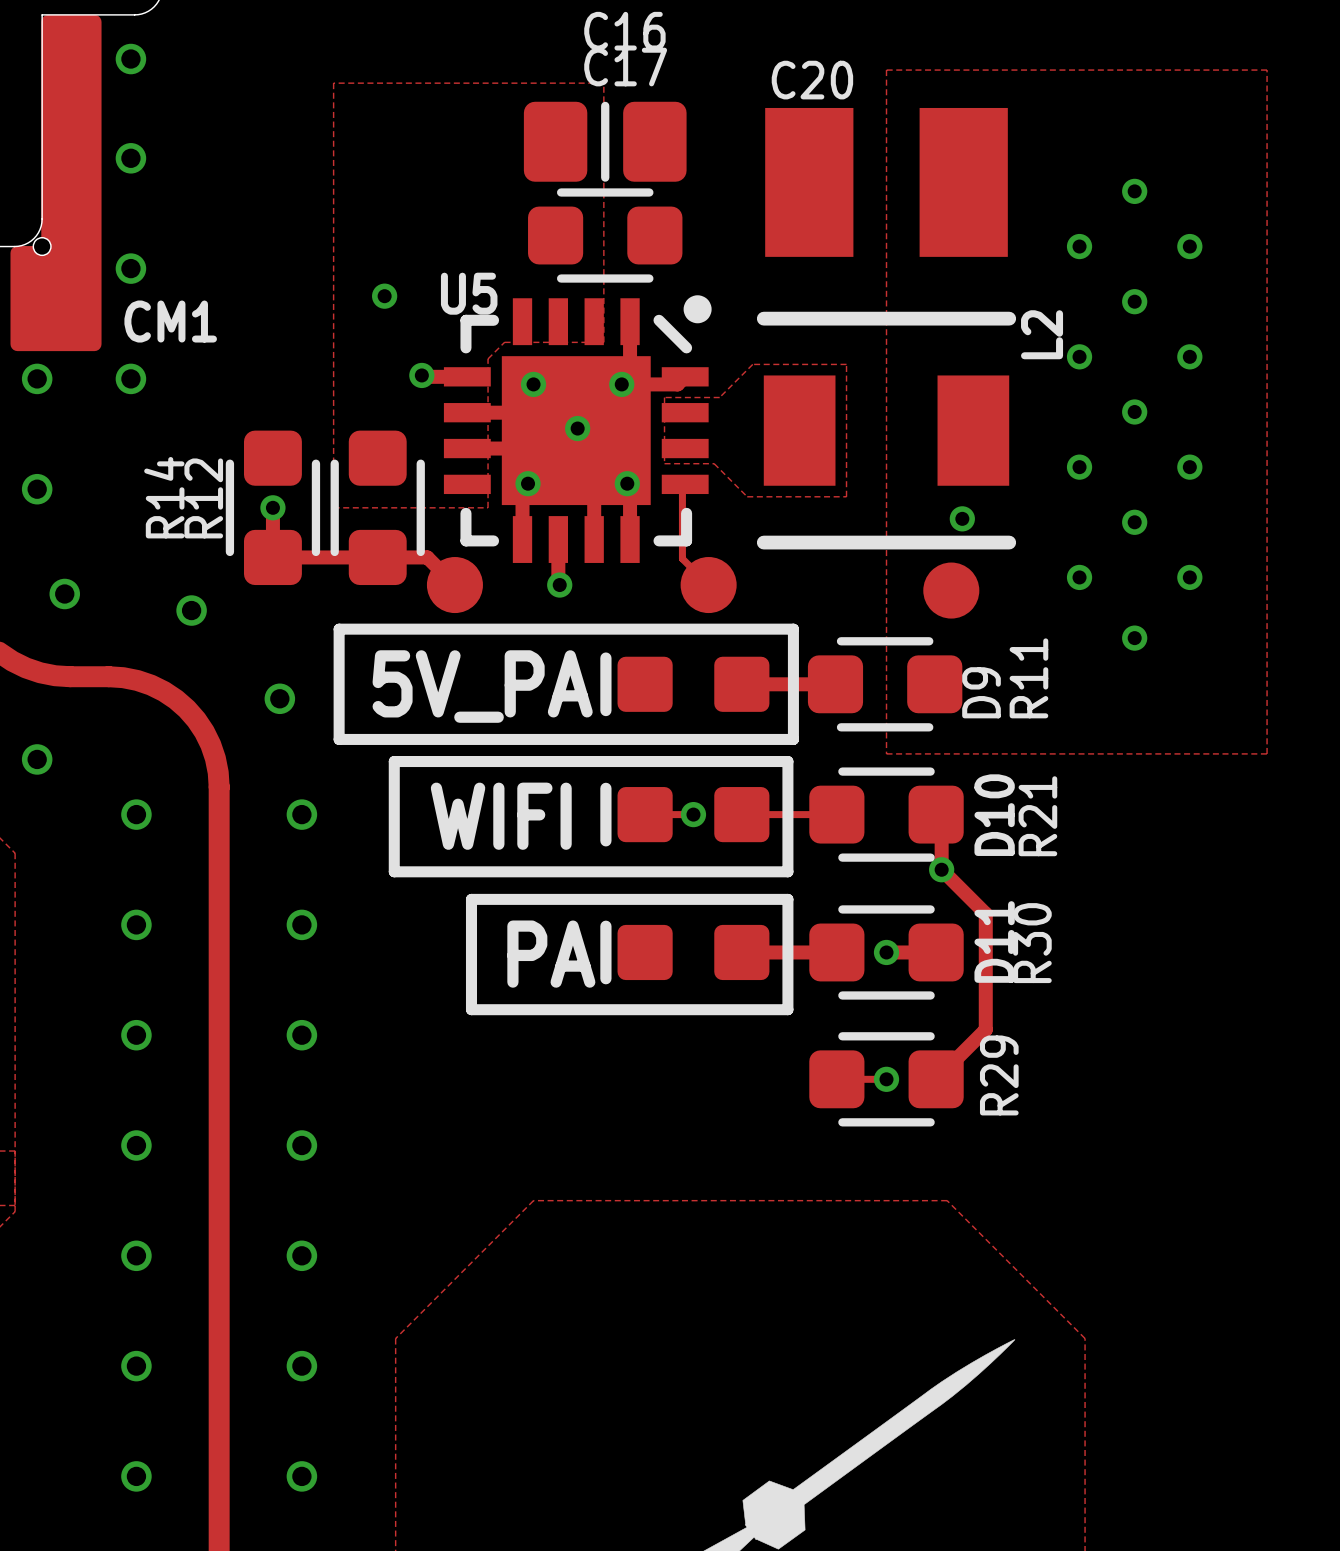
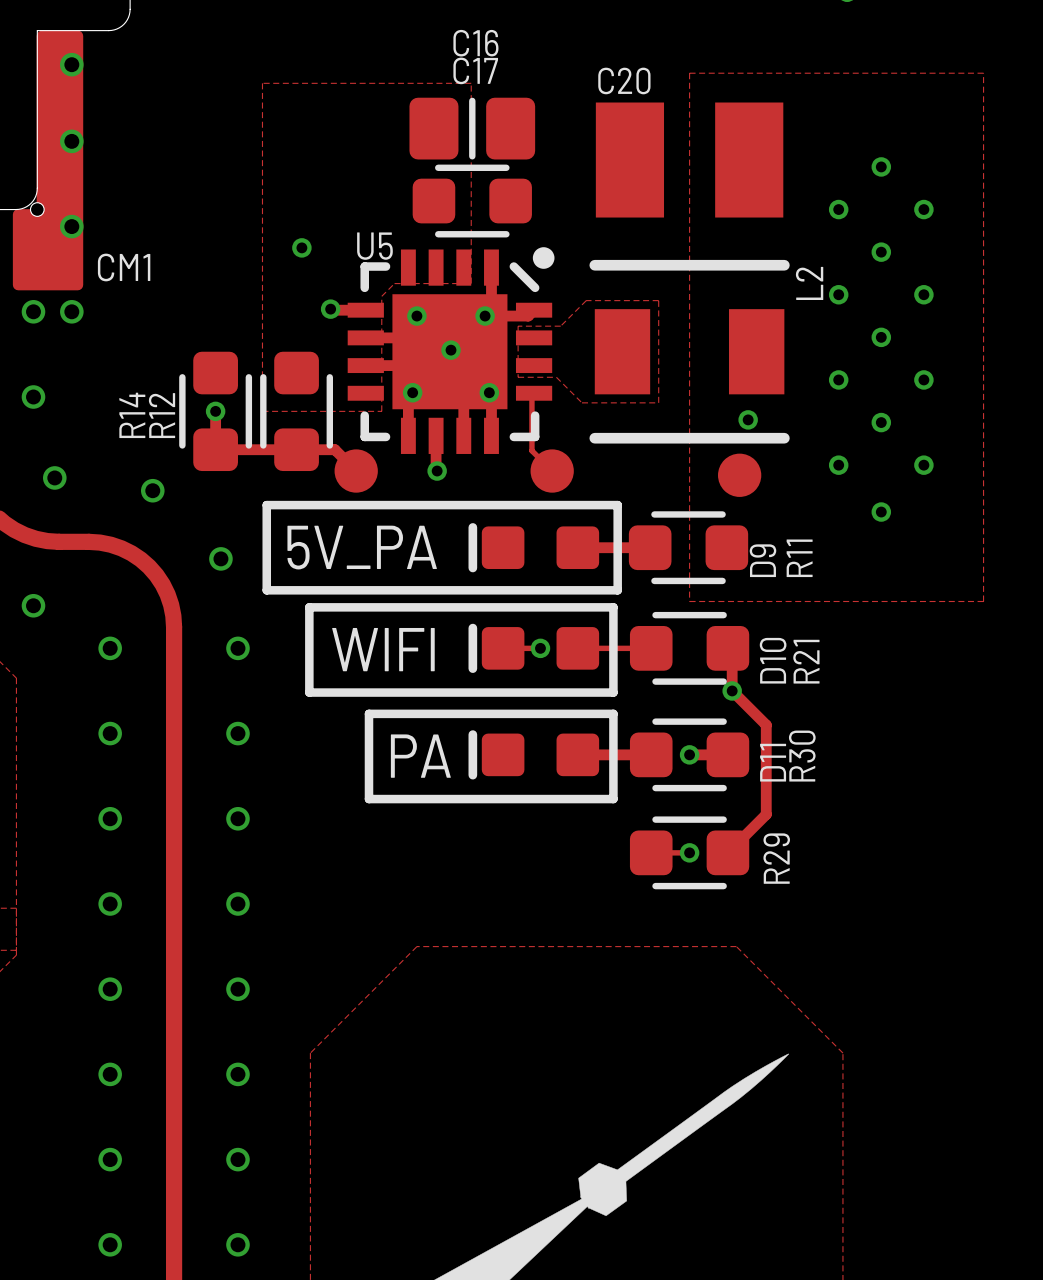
via position: (130, 59) -> (71, 64)
via position: (130, 158) -> (71, 141)
via position: (130, 268) -> (71, 226)
via position: (130, 378) -> (71, 311)

